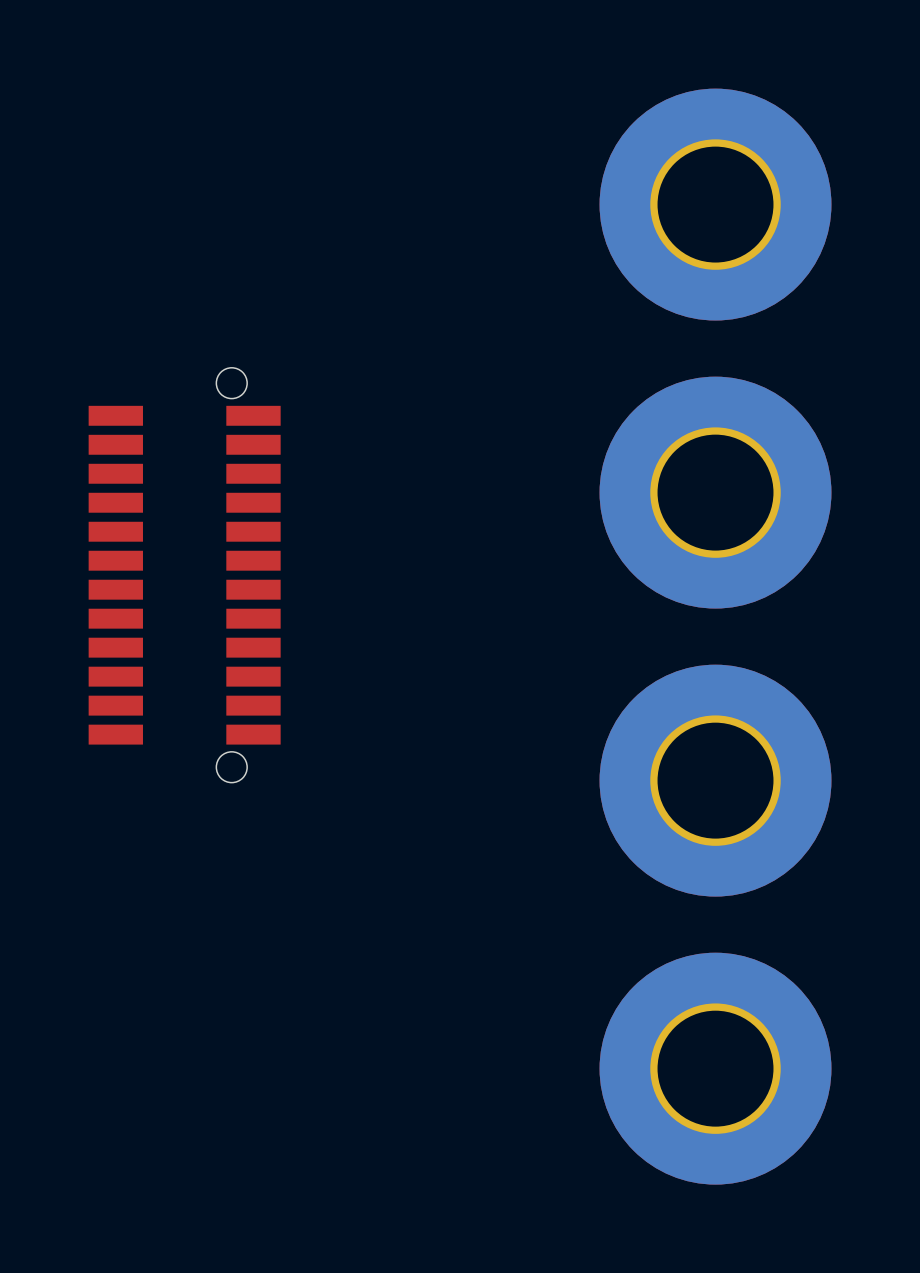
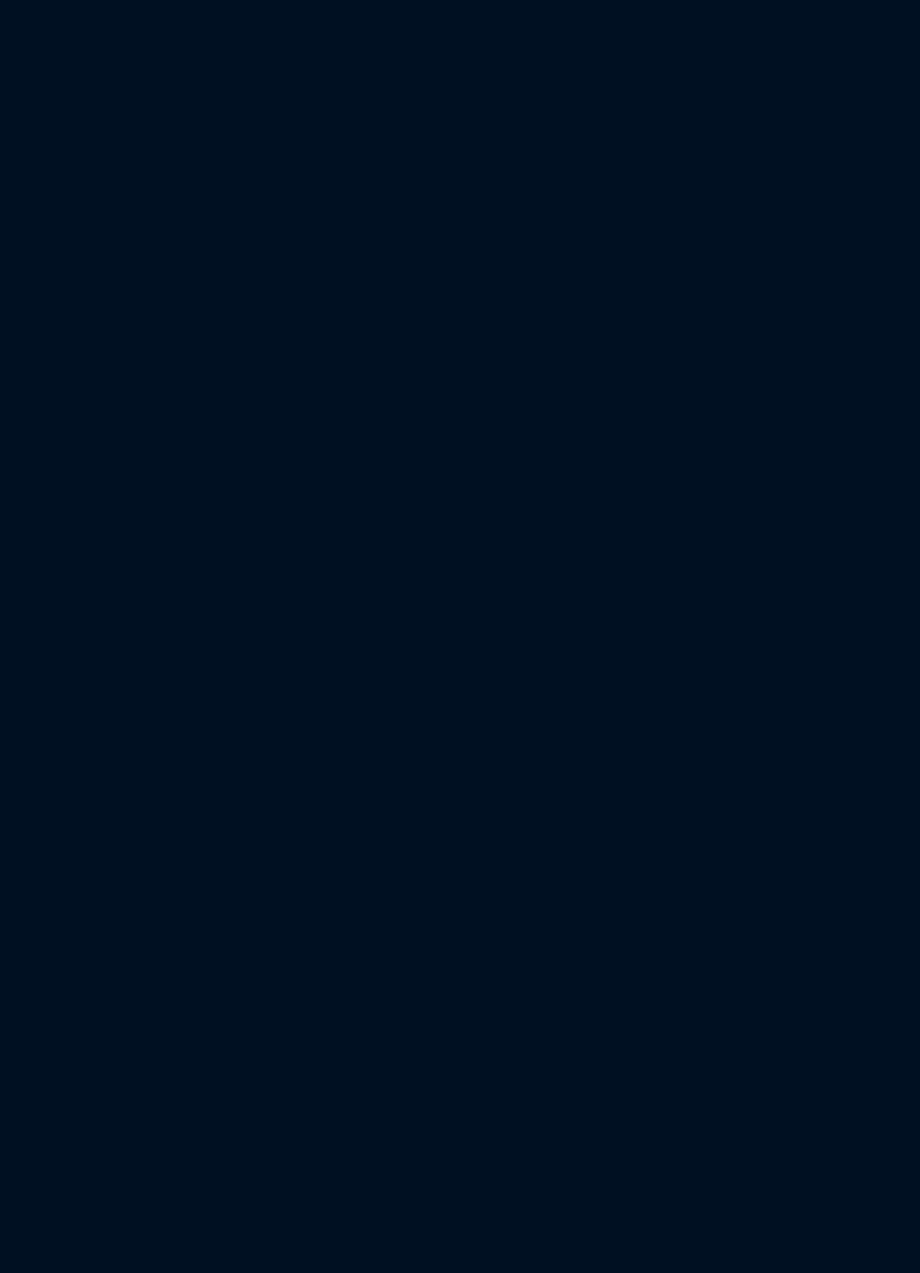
part: (715, 204) -> none
part: (715, 492) -> none
part: (184, 575) -> none
part: (715, 780) -> none
part: (715, 1068) -> none

